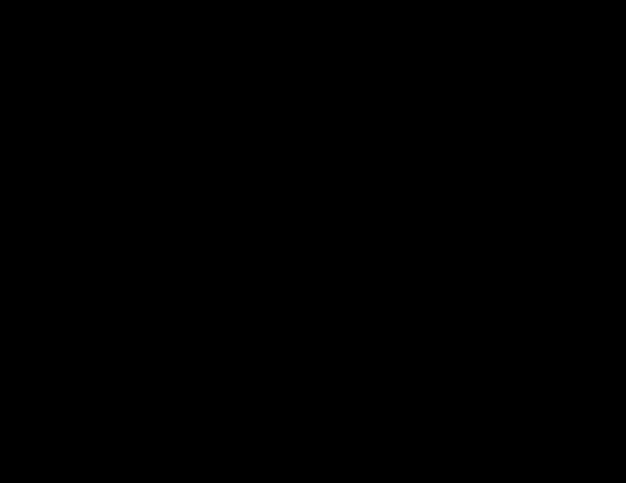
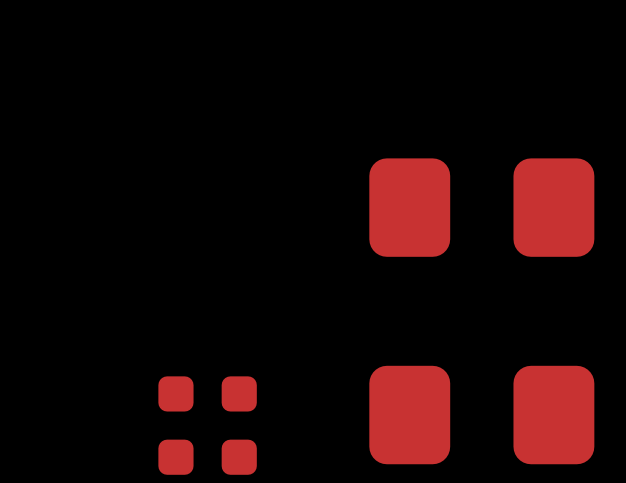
part: none -> (481, 207)
part: none -> (481, 415)
part: none -> (207, 425)

